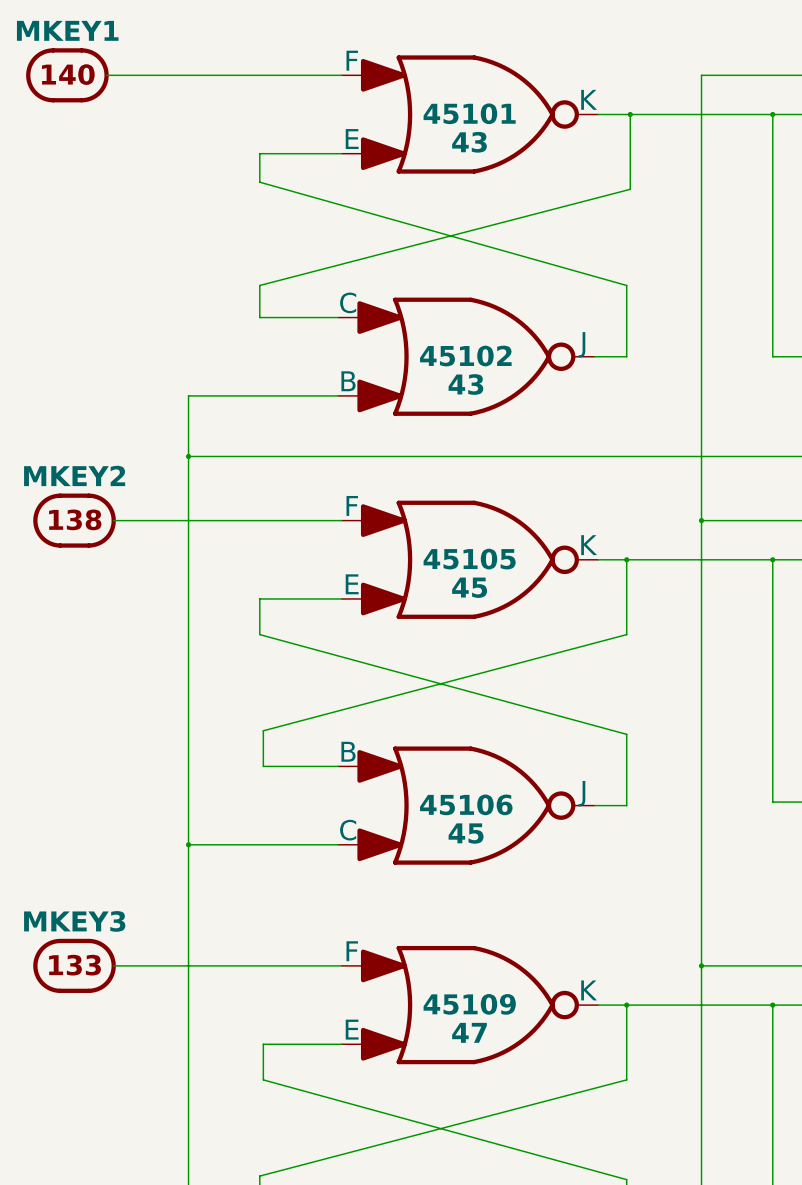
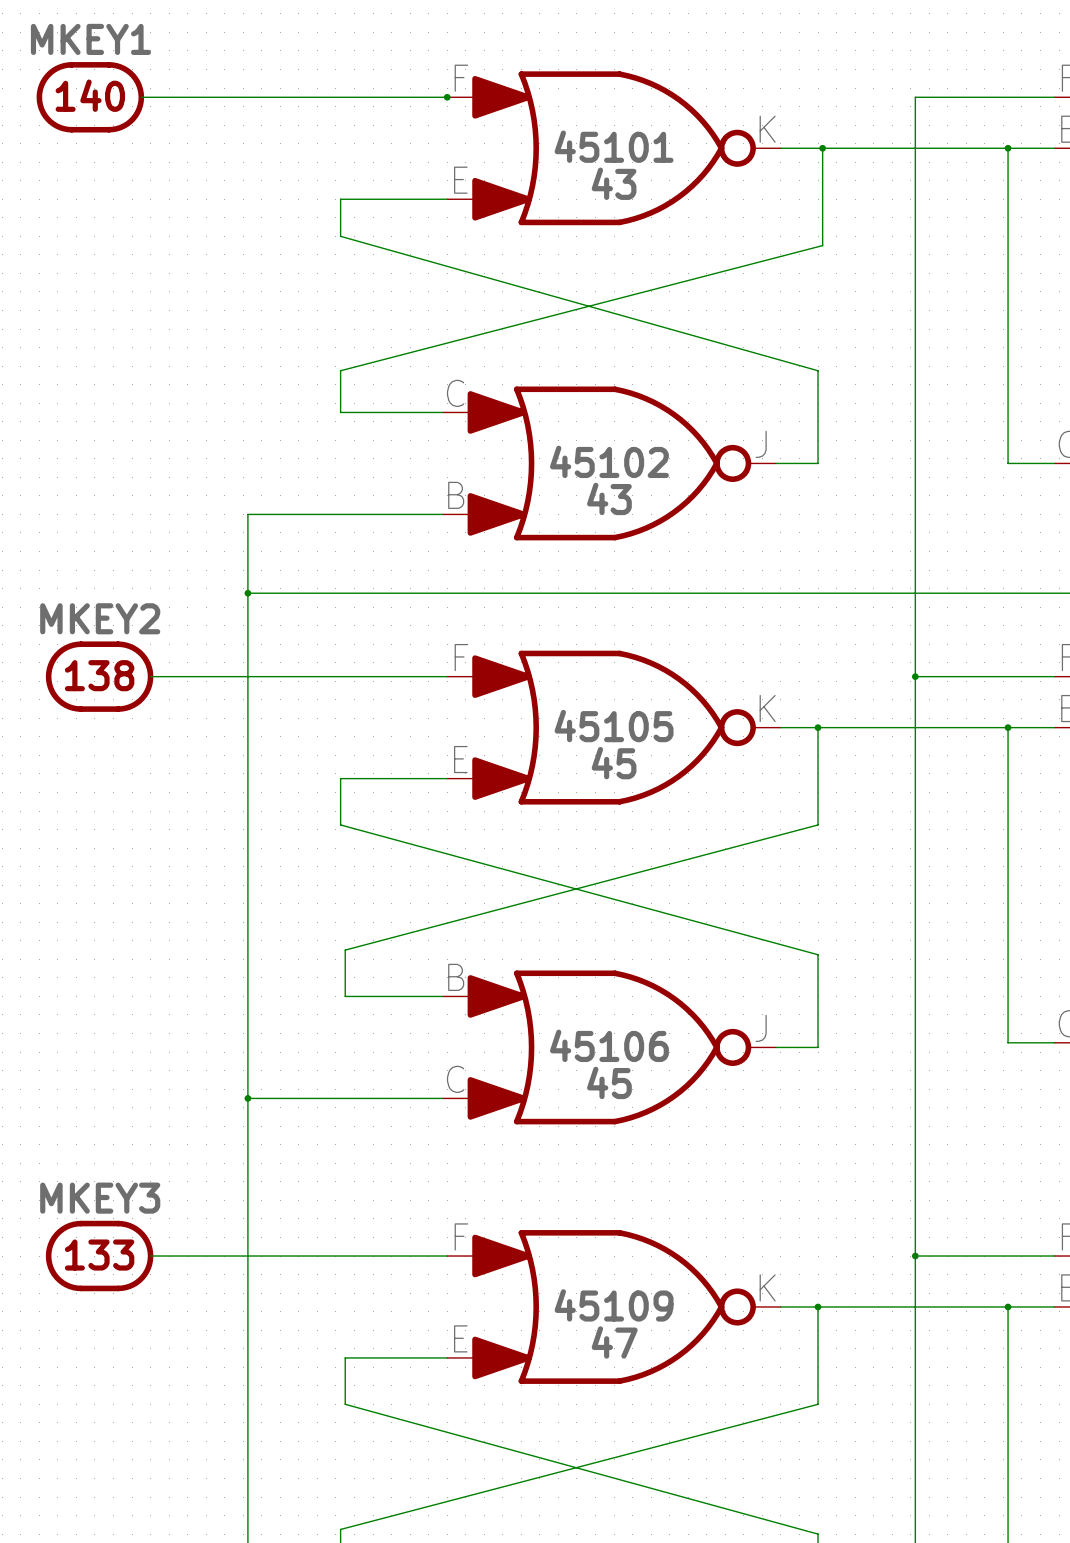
junction: none -> (447, 97)

